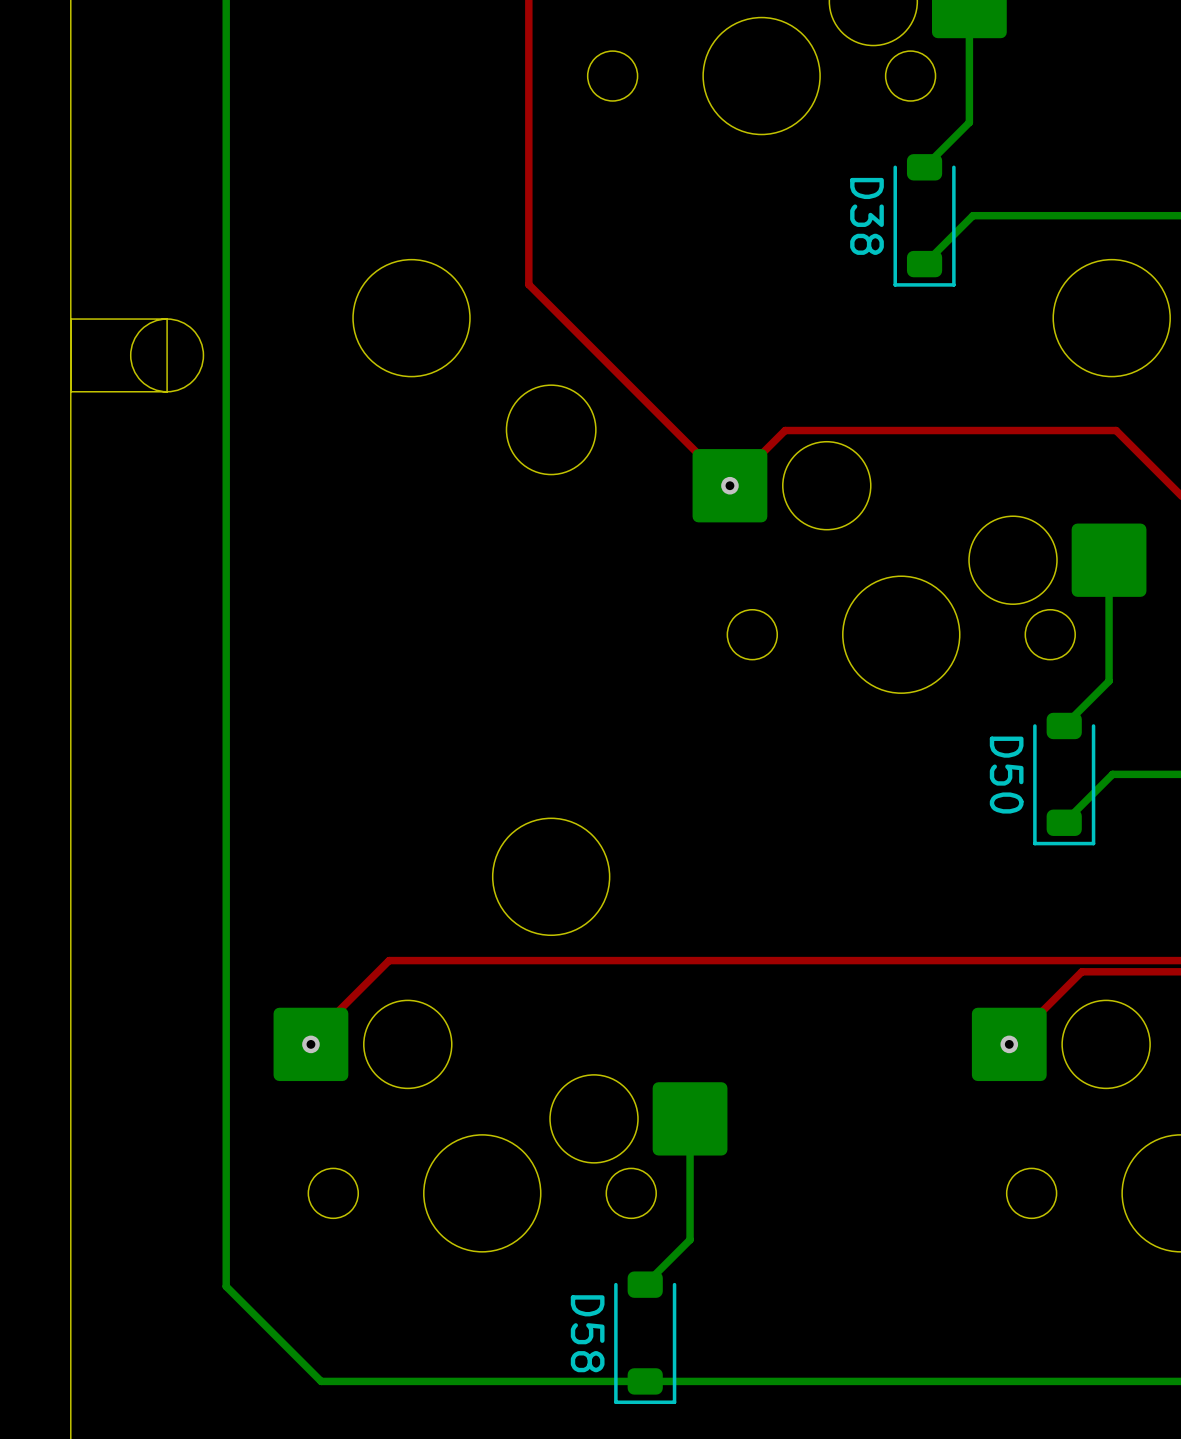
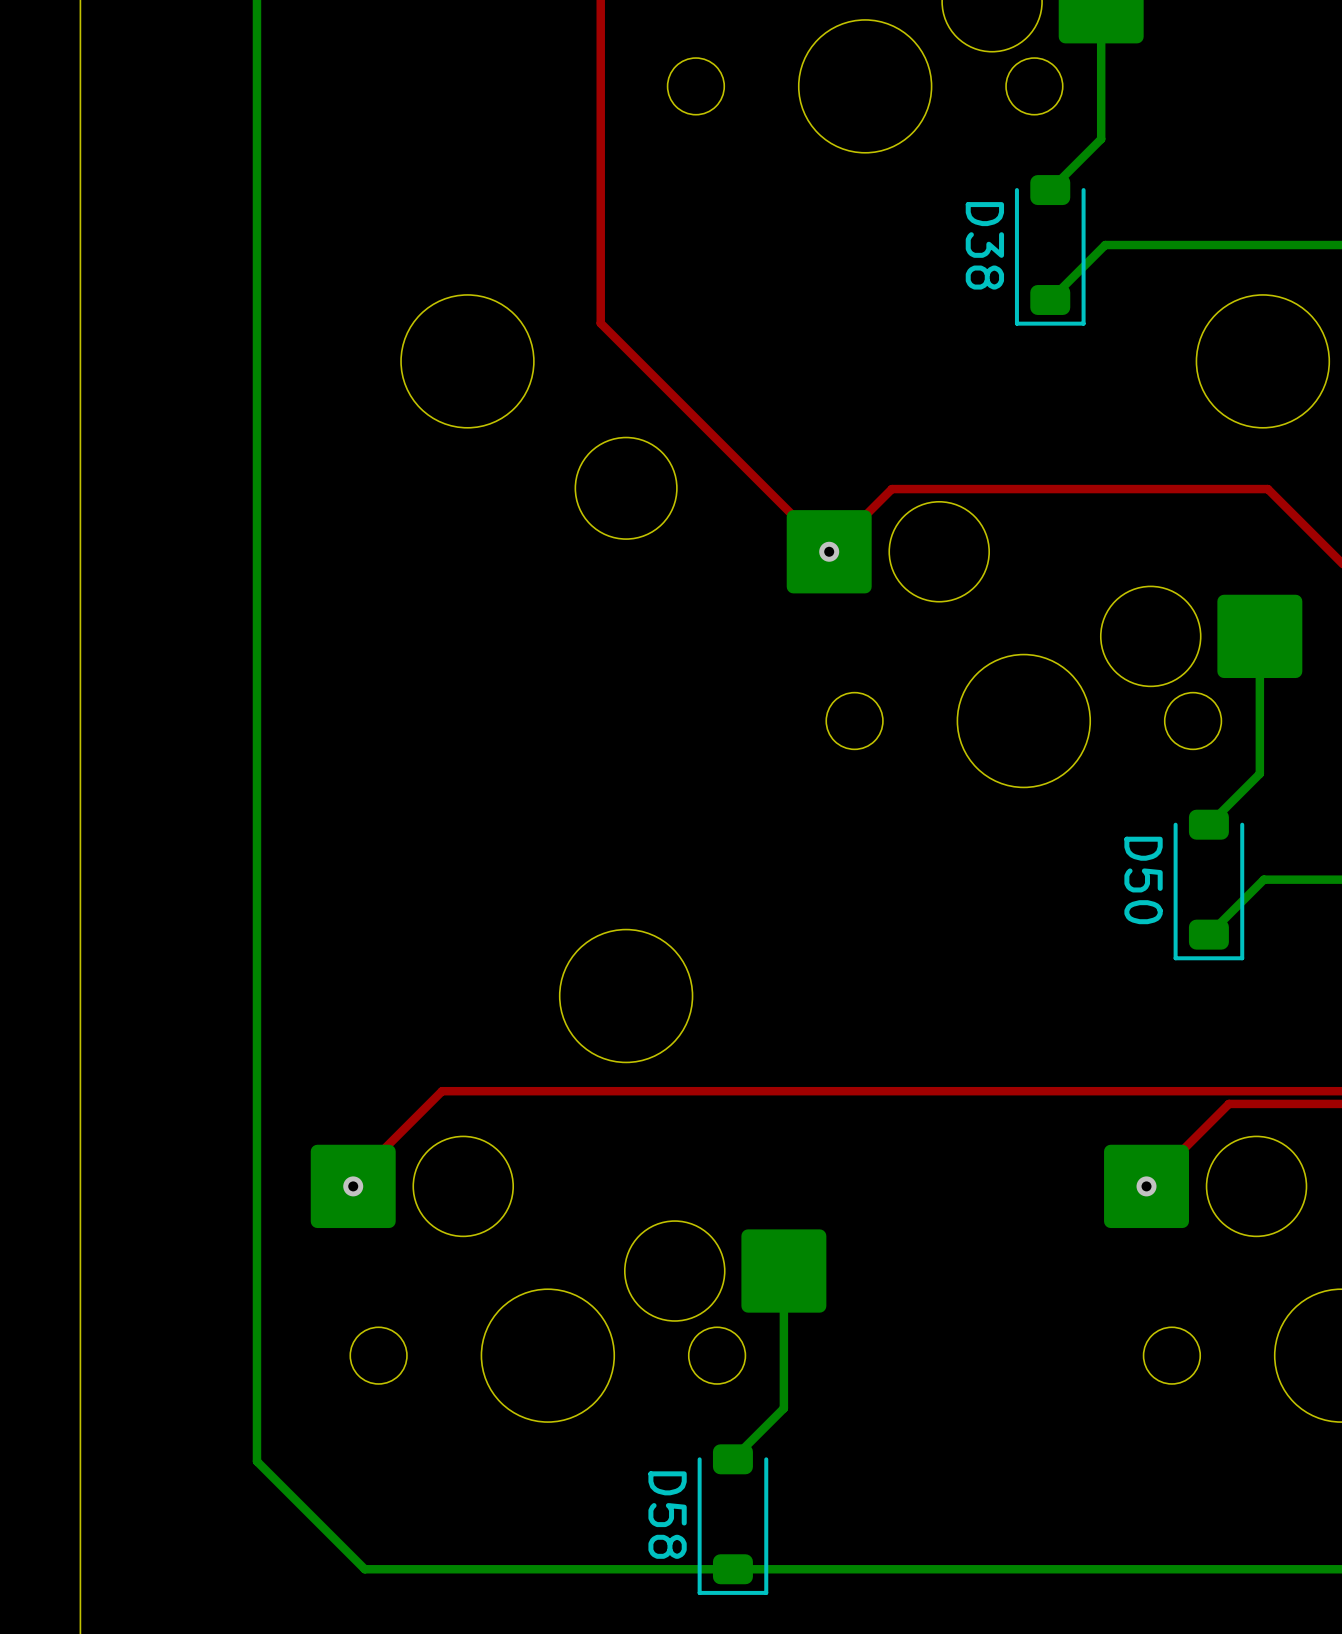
round board edge: [129, 318, 205, 393] -> none
board edge: (167, 319) (71, 319) (71, 391) (167, 391) (167, 319) -> none

